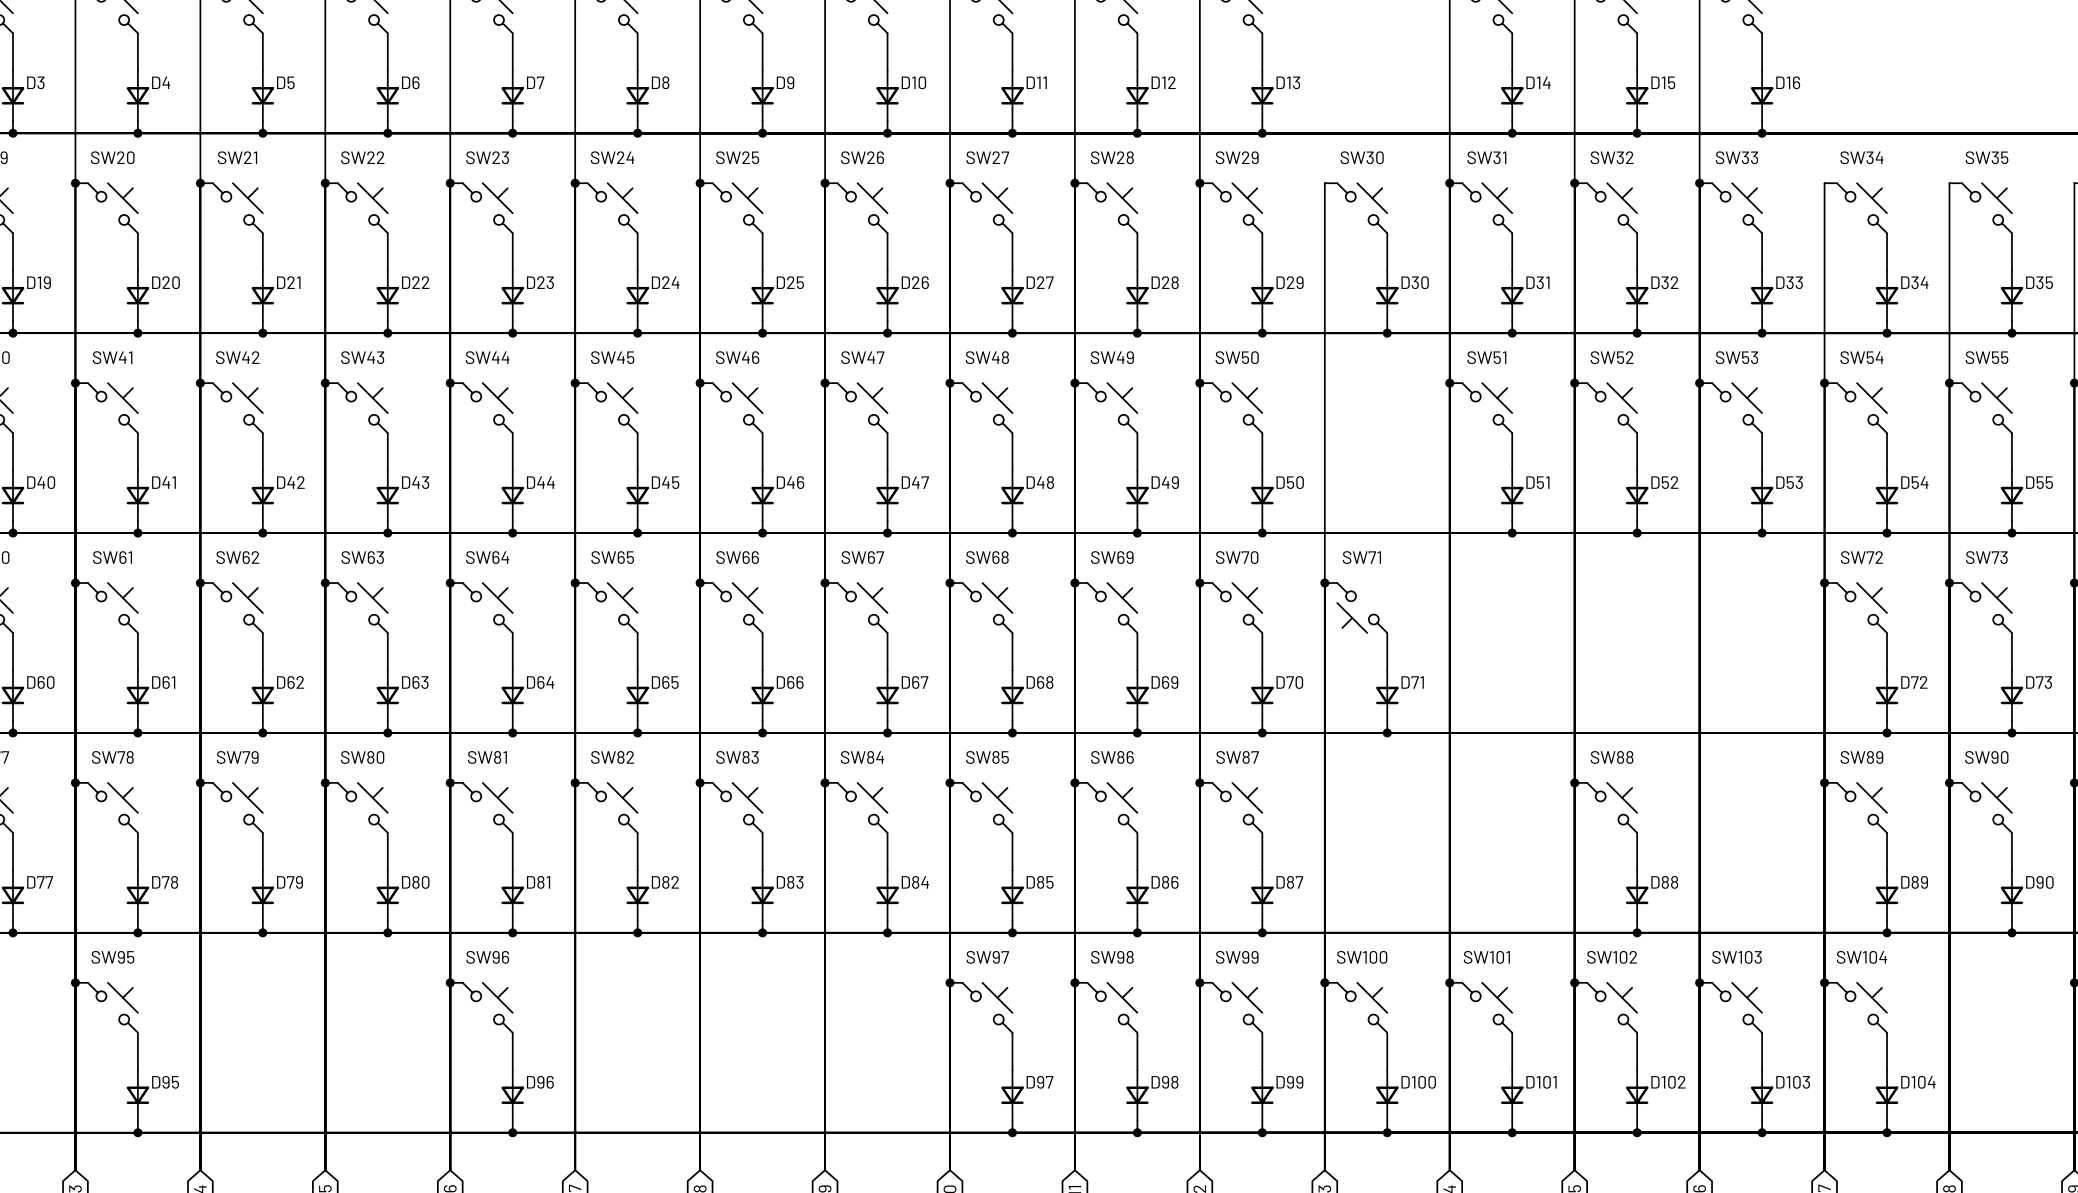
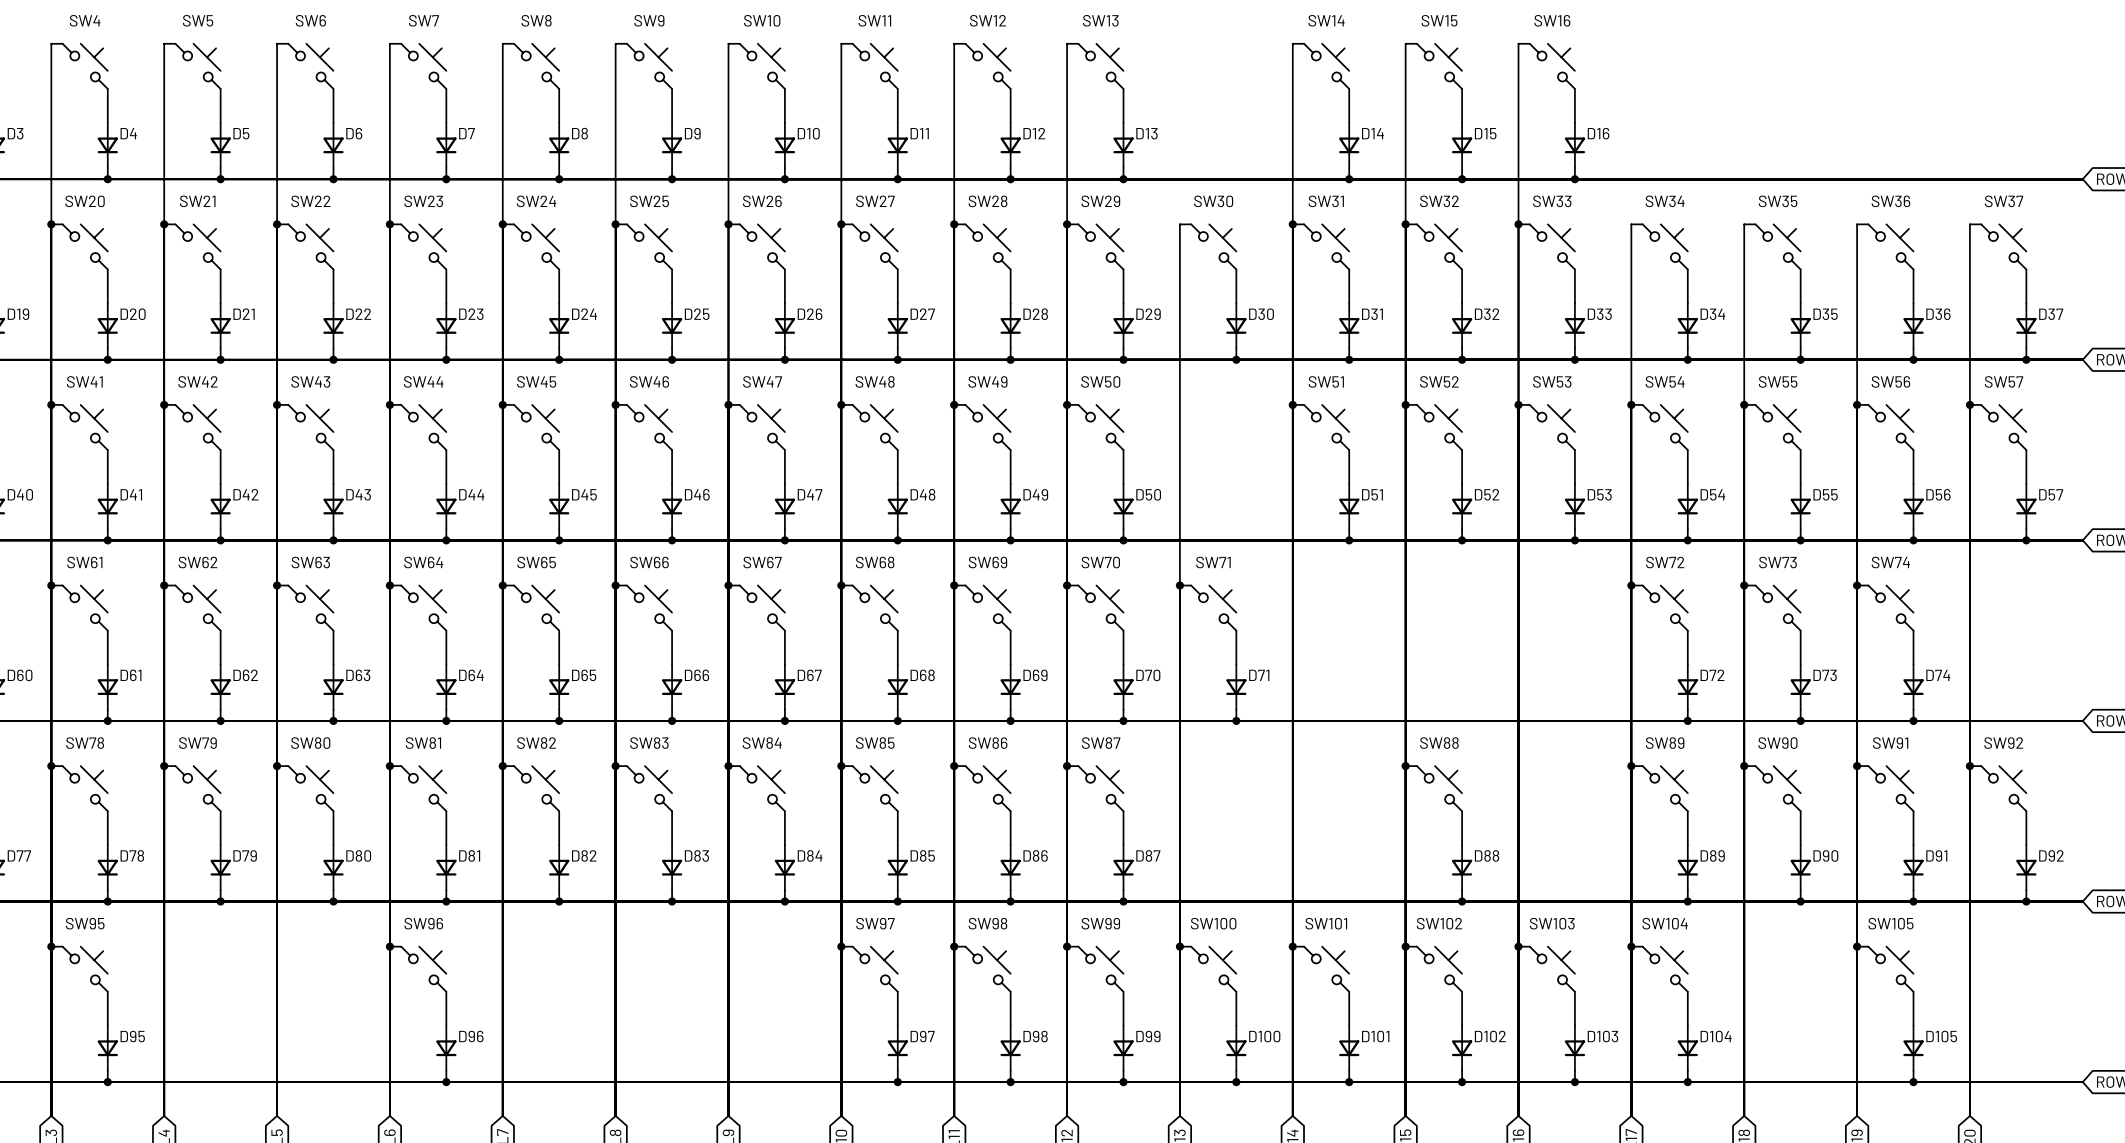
SW71 rotation: 0° (1362, 608) -> 180° (1213, 608)

